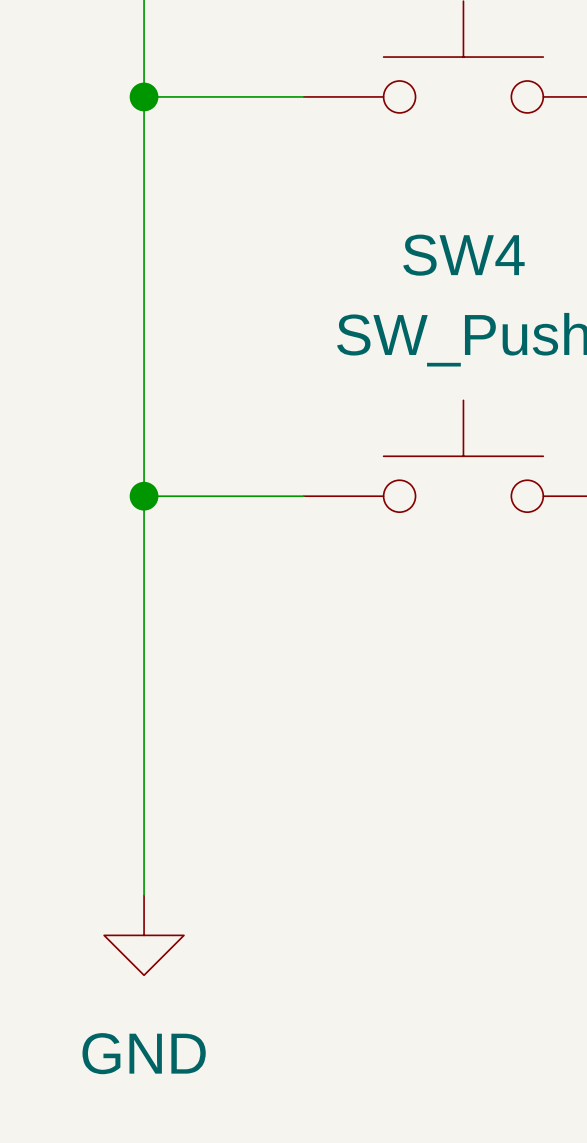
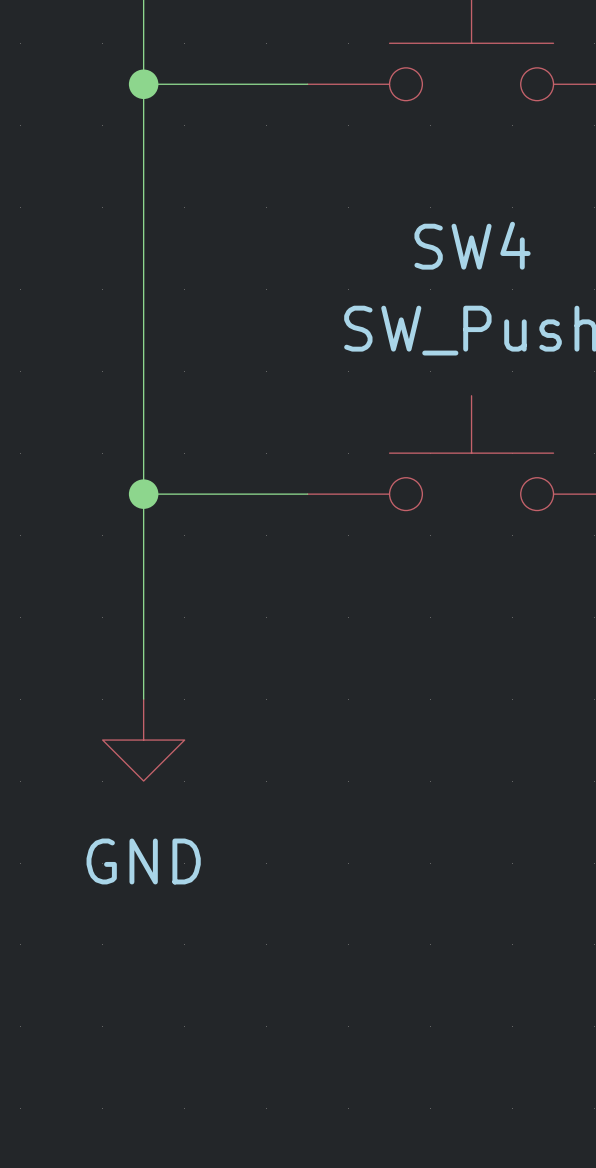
wire: (144, 695) (144, 895) -> none
power symbol position: GND (144, 935) -> GND (143, 740)

